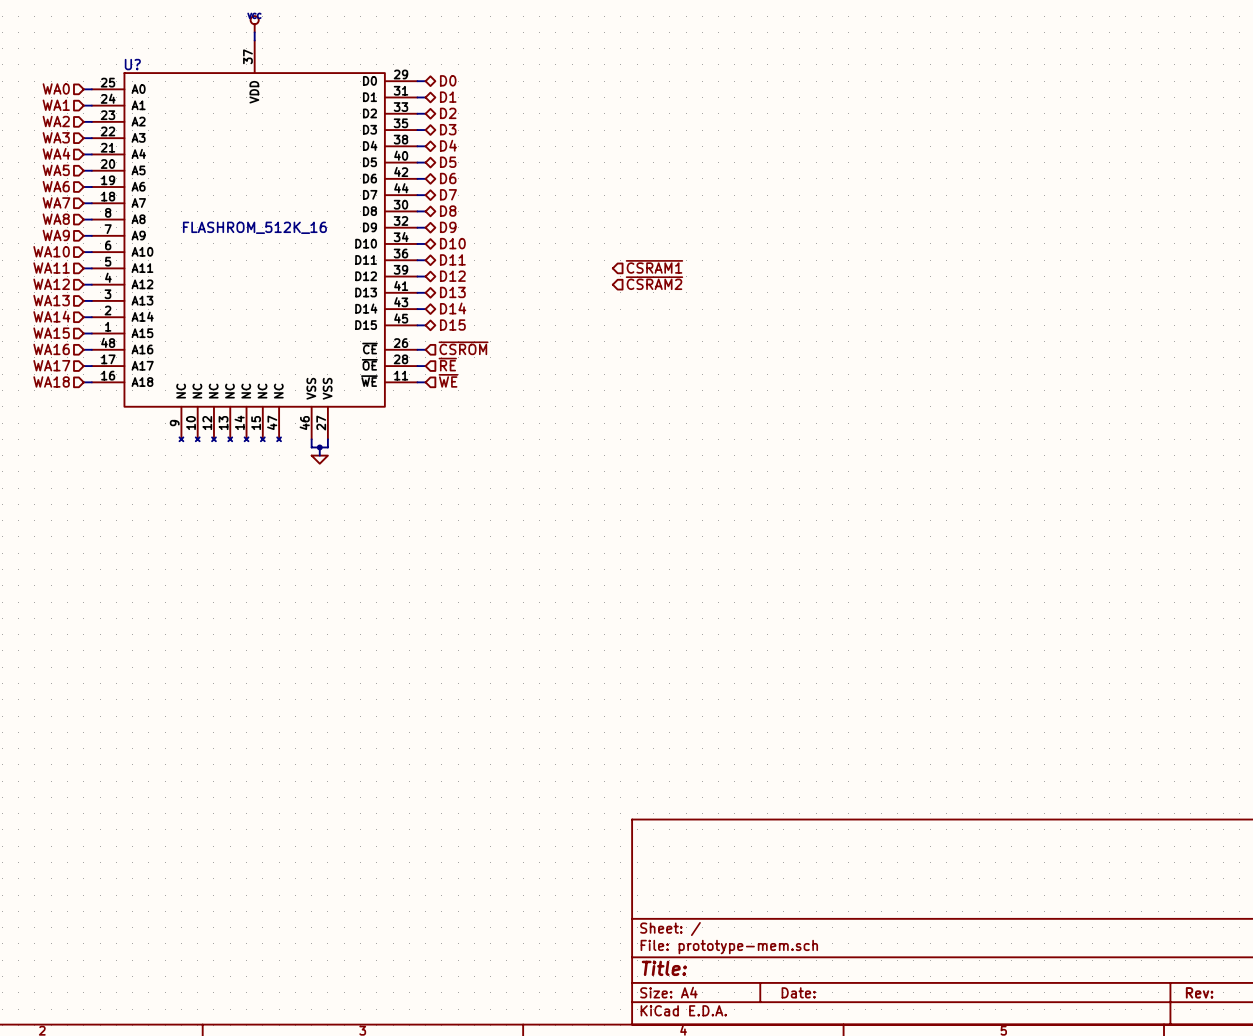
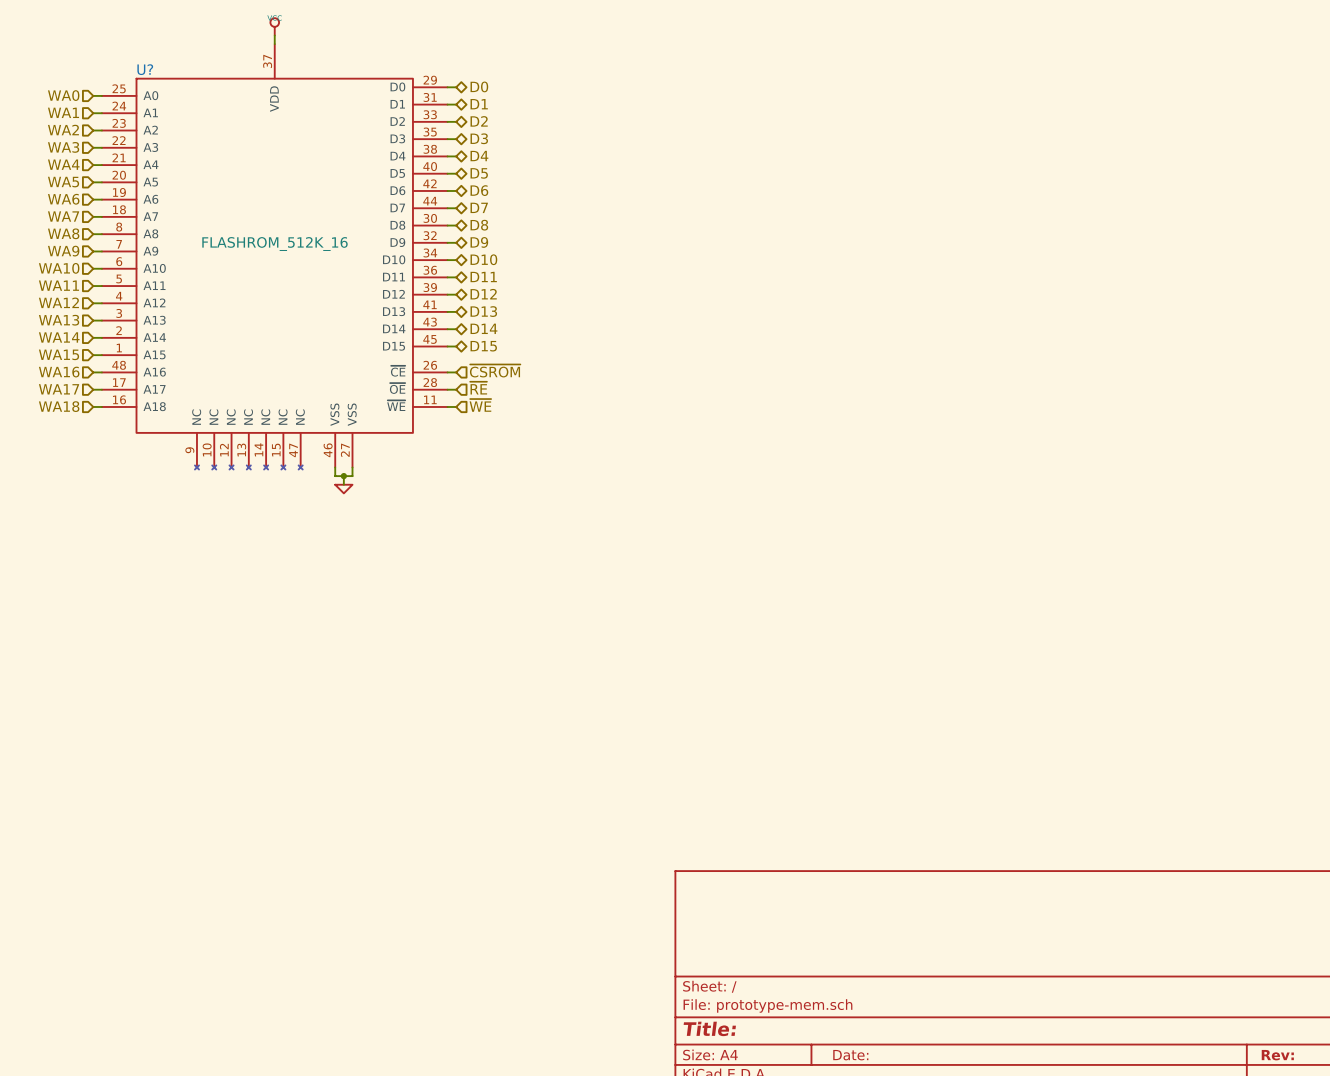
hierarchical label: ~{CSRAM1} (654, 266) -> none
hierarchical label: ~{CSRAM2} (654, 283) -> none

